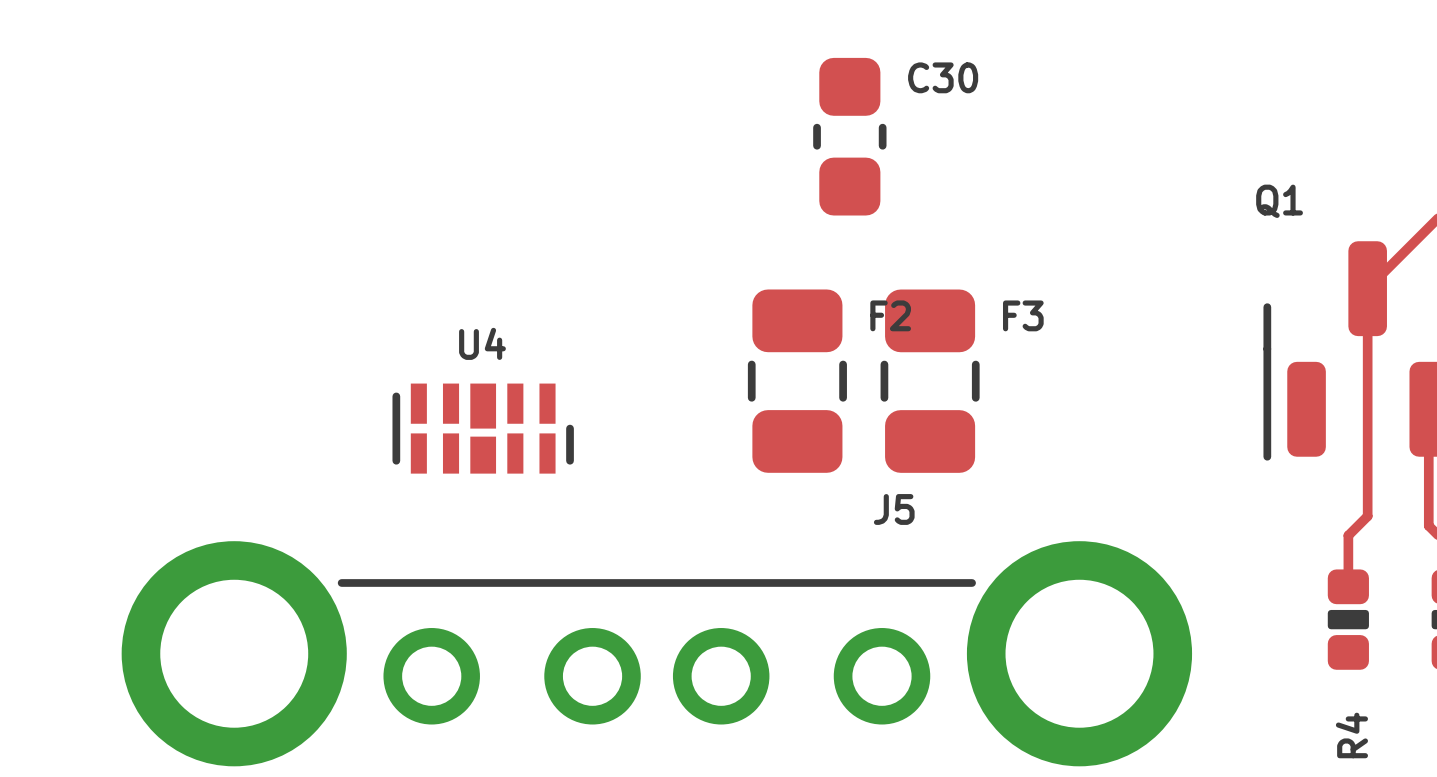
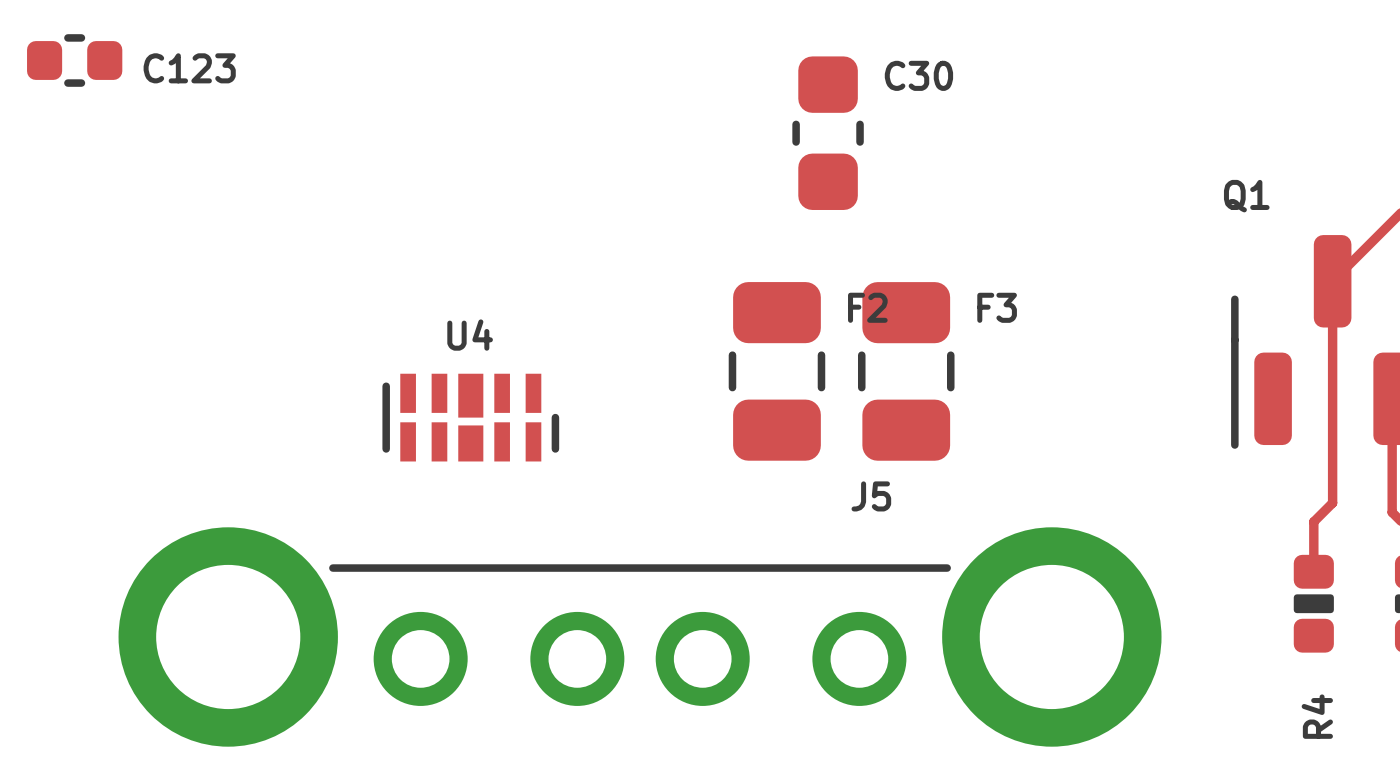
C123: none -> (74, 60)

